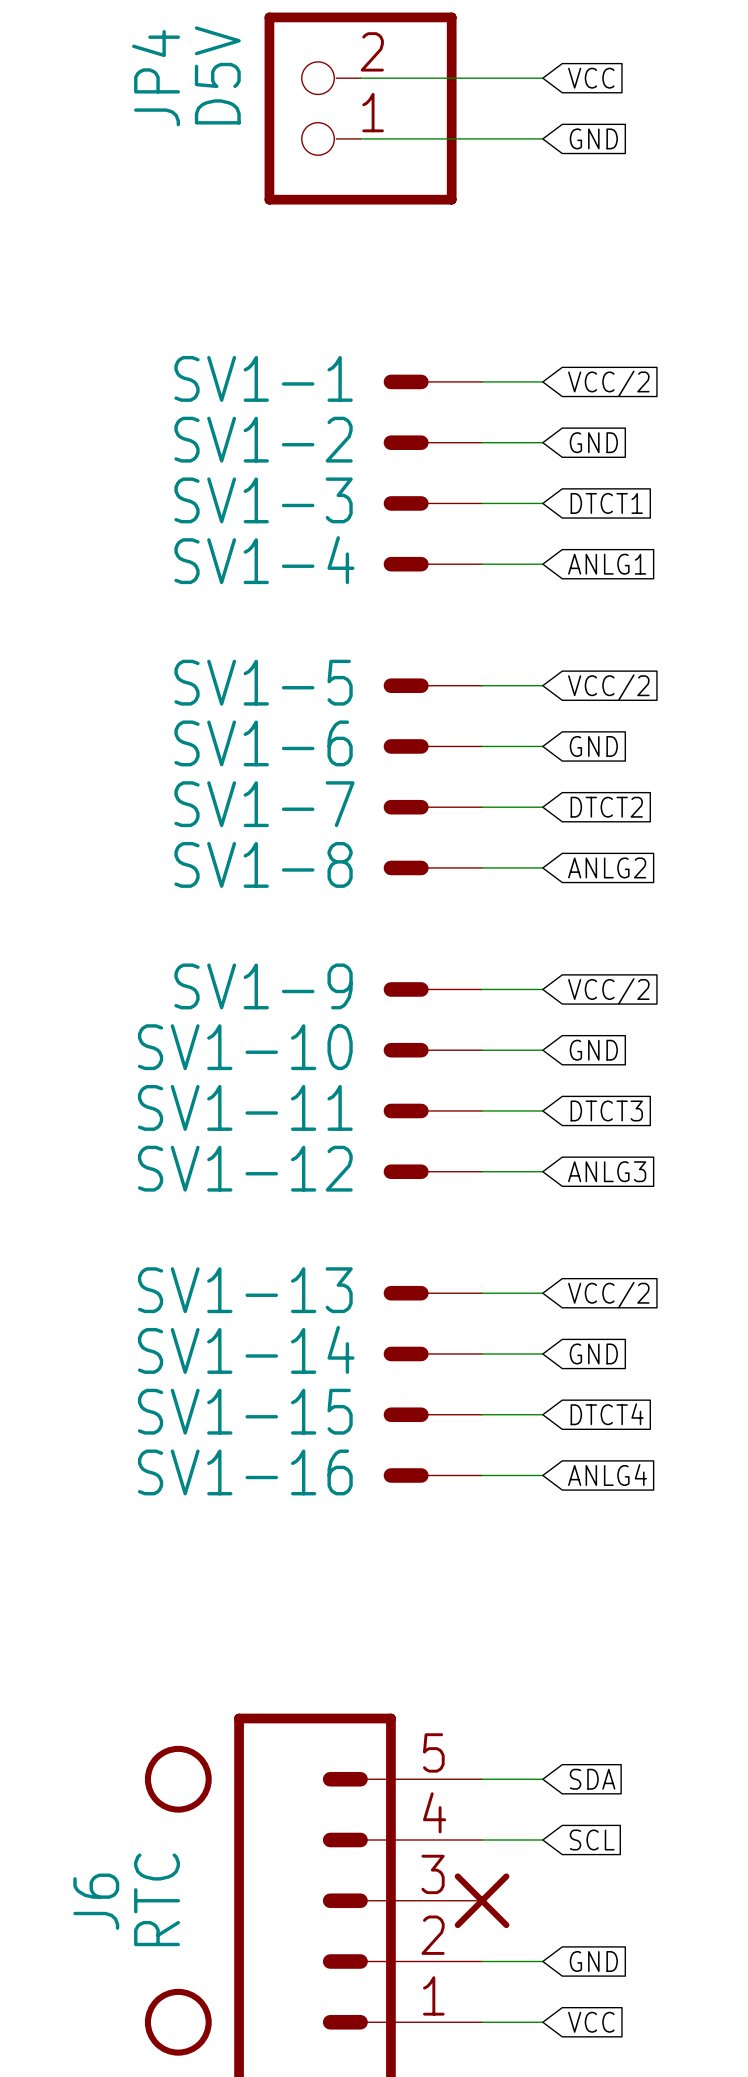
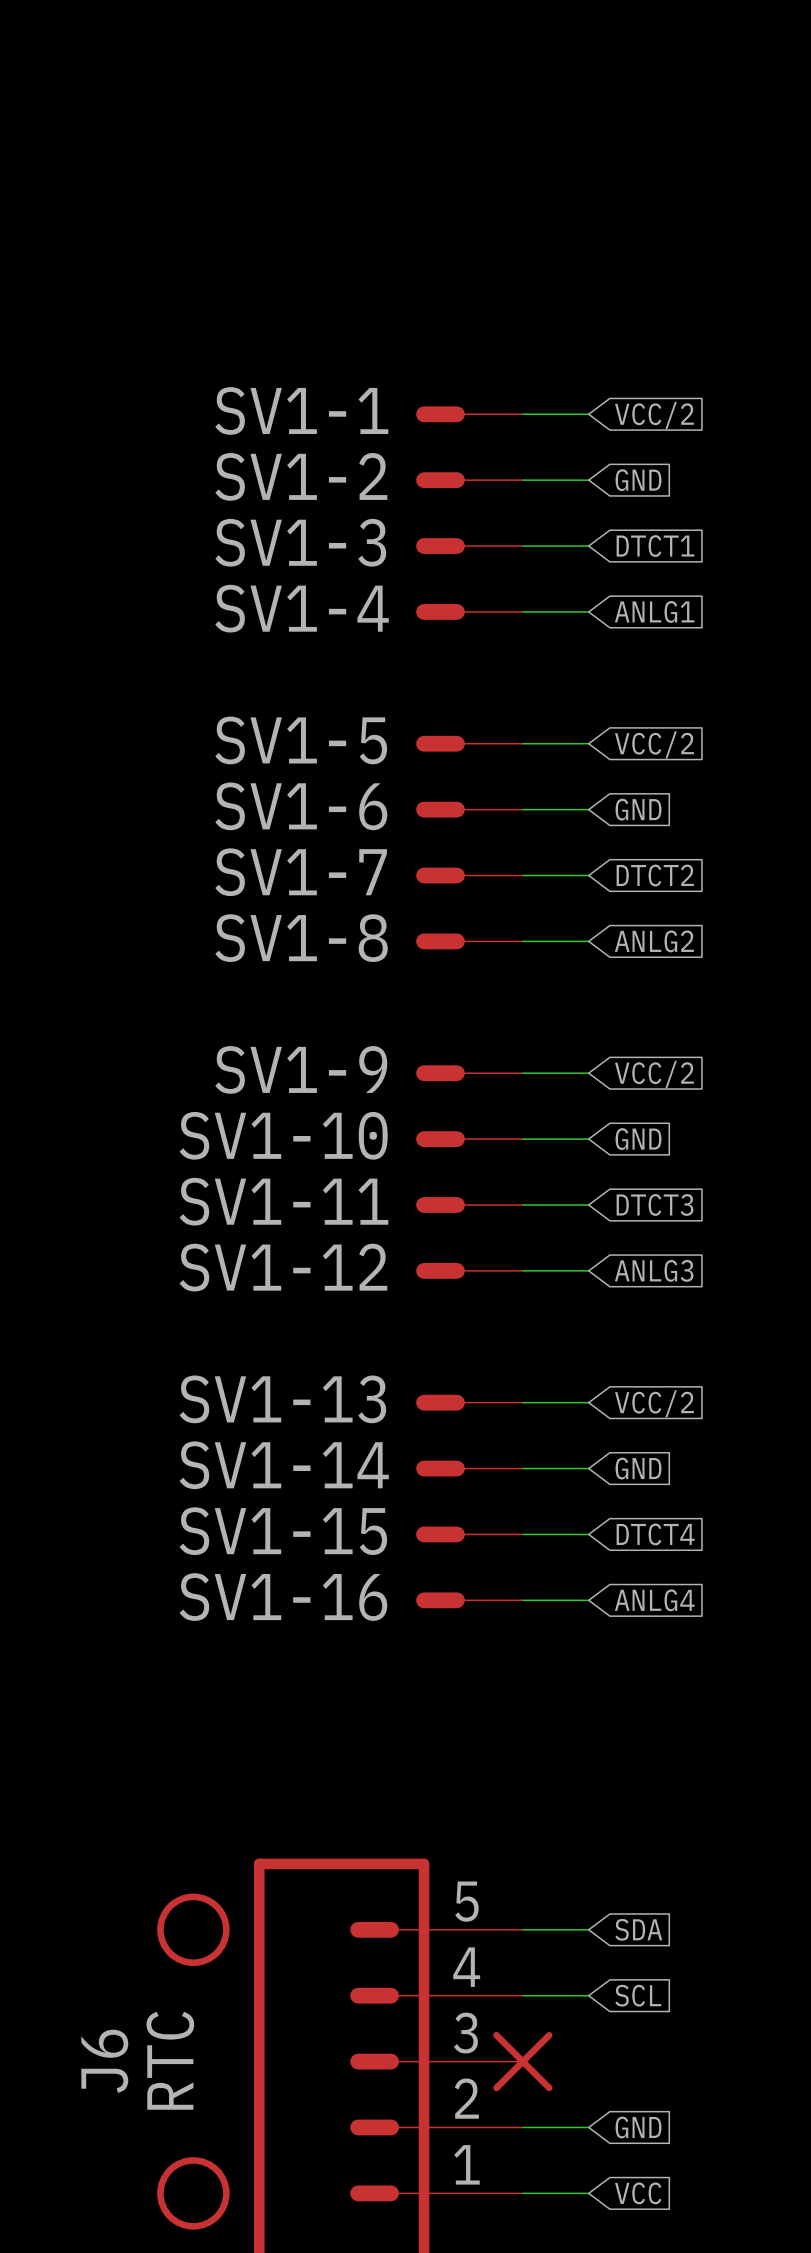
wire: (360, 78) (542, 78) -> none
global label: VCC (591, 78) -> none
JP4: D5V (360, 108) -> none
wire: (360, 138) (542, 138) -> none
global label: GND (593, 138) -> none

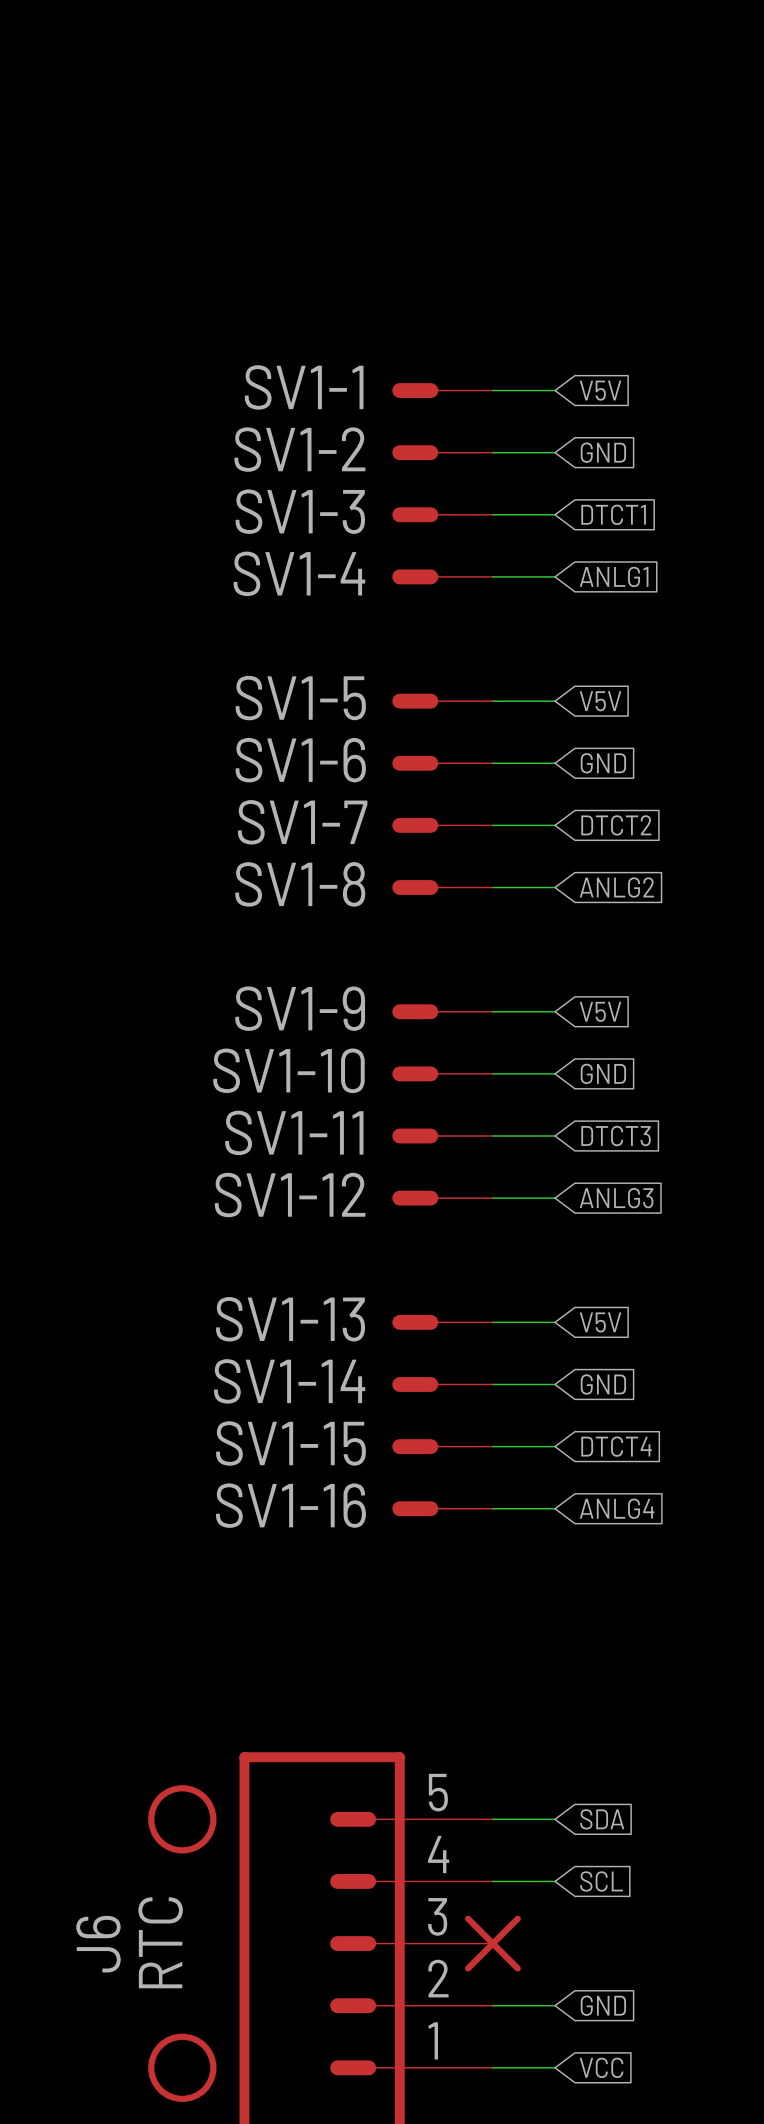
global label: VCC/2 (654, 415) -> V5V (600, 390)
global label: VCC/2 (654, 744) -> V5V (600, 701)
global label: VCC/2 (654, 1074) -> V5V (600, 1011)
global label: VCC/2 (654, 1403) -> V5V (600, 1322)

